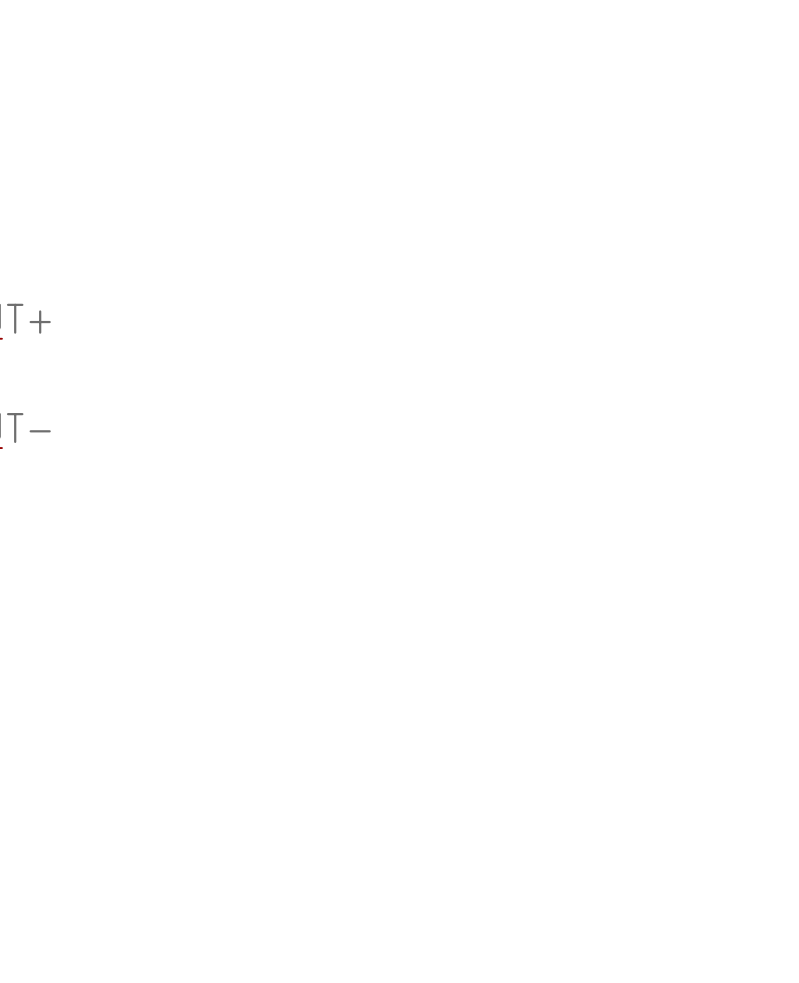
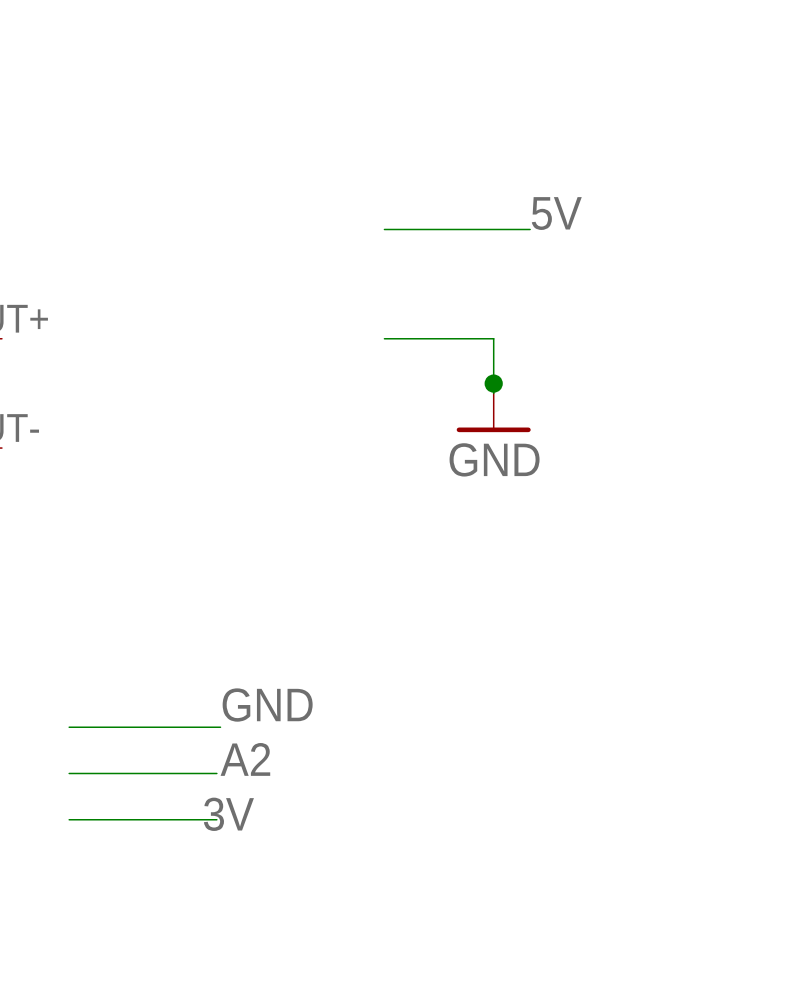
label: none -> 5V (556, 213)
wire: none -> (384, 229) (530, 229)
wire: none -> (384, 338) (493, 338) (493, 393)
junction: none -> (493, 383)
power symbol: none -> GND (493, 407)
label: none -> GND (267, 705)
wire: none -> (69, 727) (220, 727)
label: none -> A2 (245, 759)
wire: none -> (69, 773) (216, 773)
label: none -> 3V (228, 814)
wire: none -> (69, 819) (216, 819)

